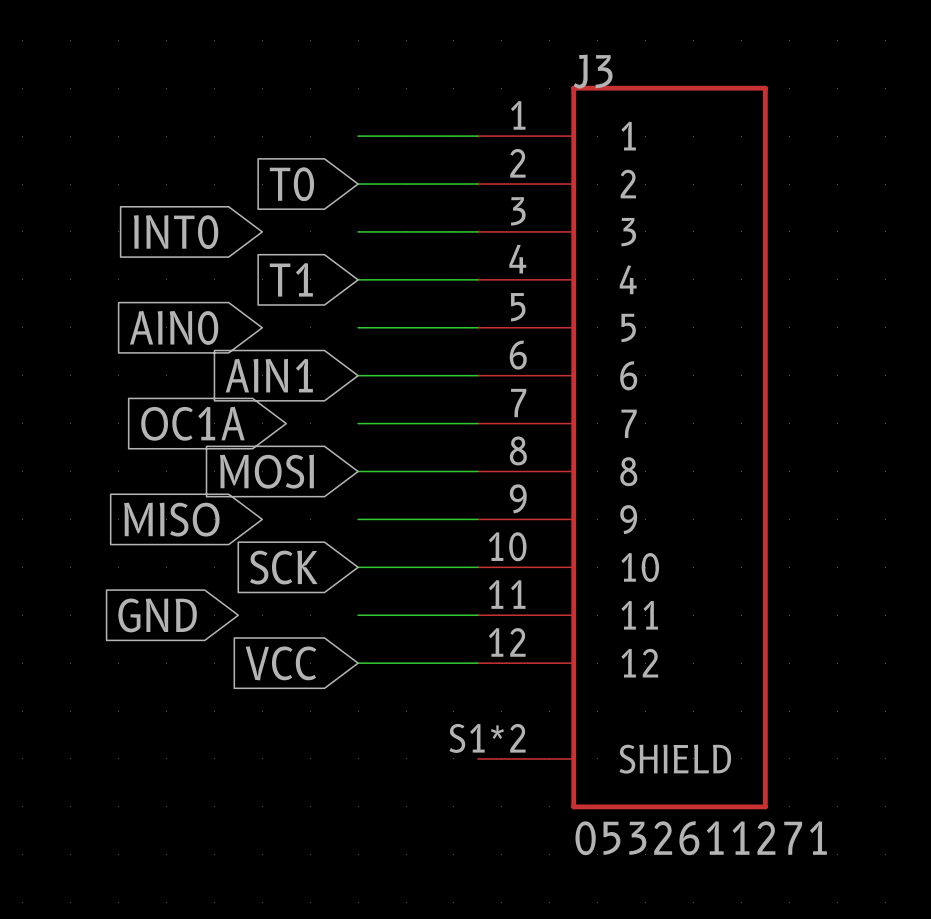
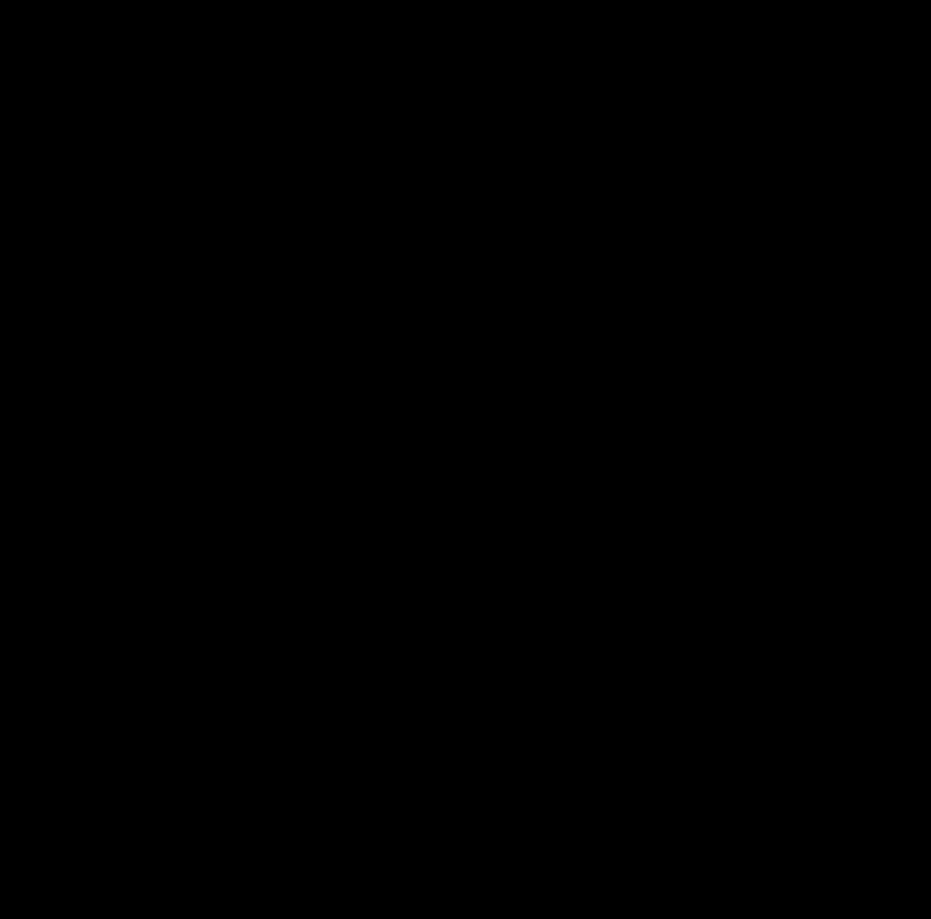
wire: (358, 136) (477, 136) -> none
global label: T0 (291, 184) -> none
wire: (358, 184) (477, 184) -> none
wire: (358, 231) (477, 231) -> none
global label: INT0 (176, 232) -> none
global label: T1 (291, 279) -> none
wire: (358, 279) (477, 279) -> none
global label: AIN0 (174, 327) -> none
wire: (358, 327) (477, 327) -> none
global label: AIN1 (269, 375) -> none
wire: (358, 375) (477, 375) -> none
global label: OC1A (192, 423) -> none
wire: (358, 423) (477, 423) -> none
J3: 0532611271 (622, 447) -> none
global label: MOSI (266, 471) -> none
wire: (358, 471) (477, 471) -> none
global label: MISO (171, 519) -> none
wire: (358, 519) (477, 519) -> none
global label: SCK (283, 567) -> none
wire: (358, 567) (477, 567) -> none
global label: GND (157, 615) -> none
wire: (358, 615) (477, 615) -> none
global label: VCC (281, 663) -> none
wire: (358, 663) (477, 663) -> none

